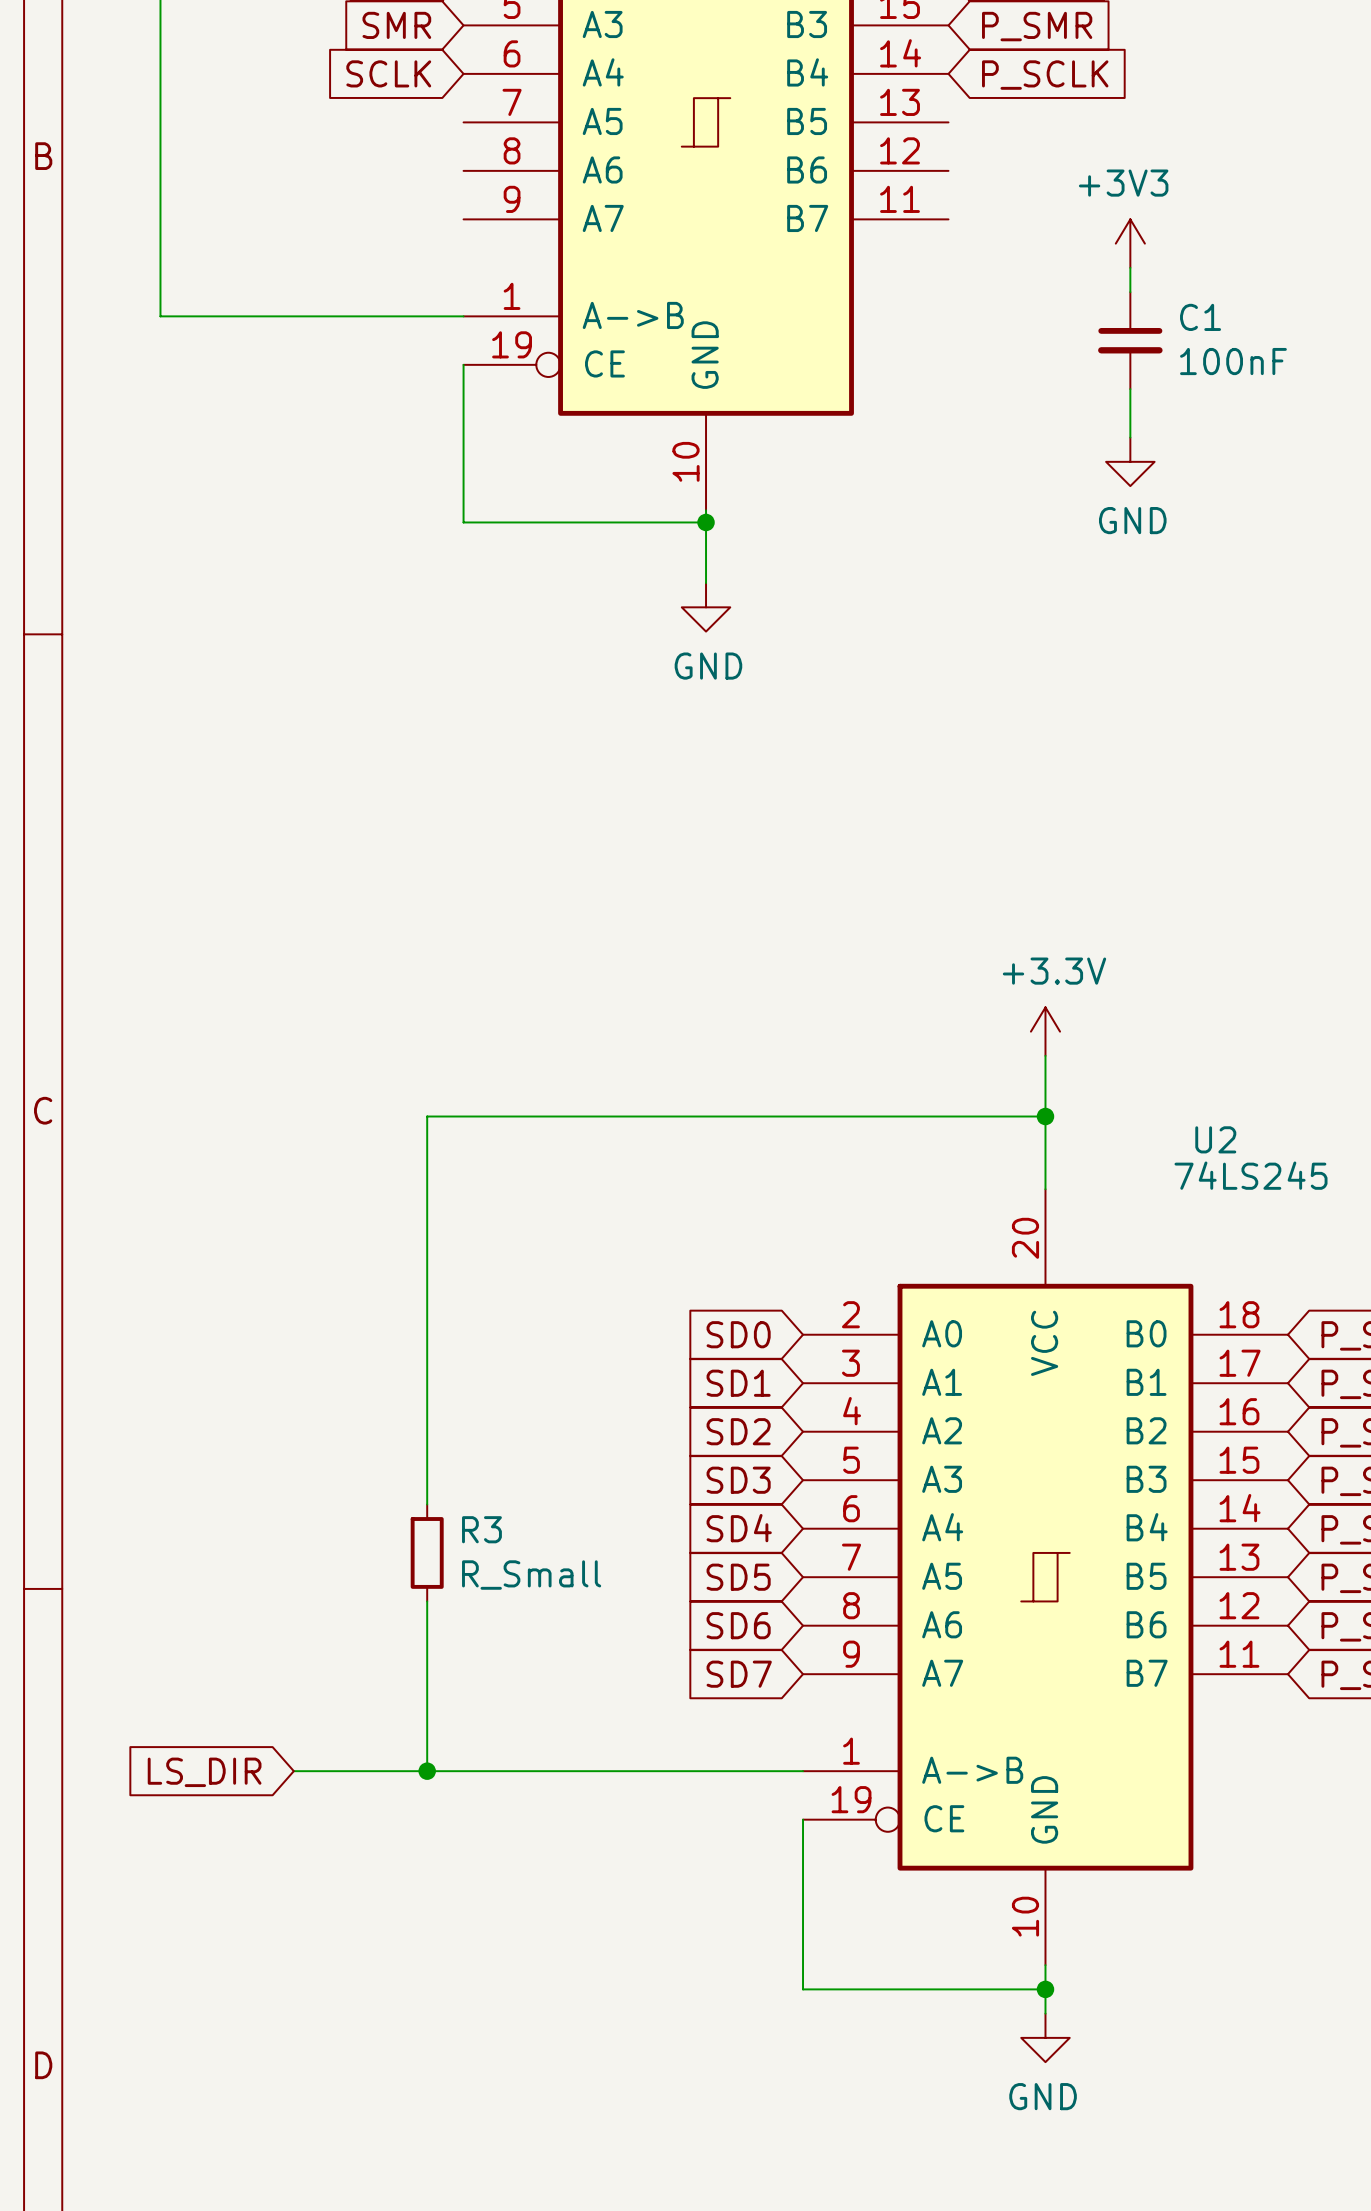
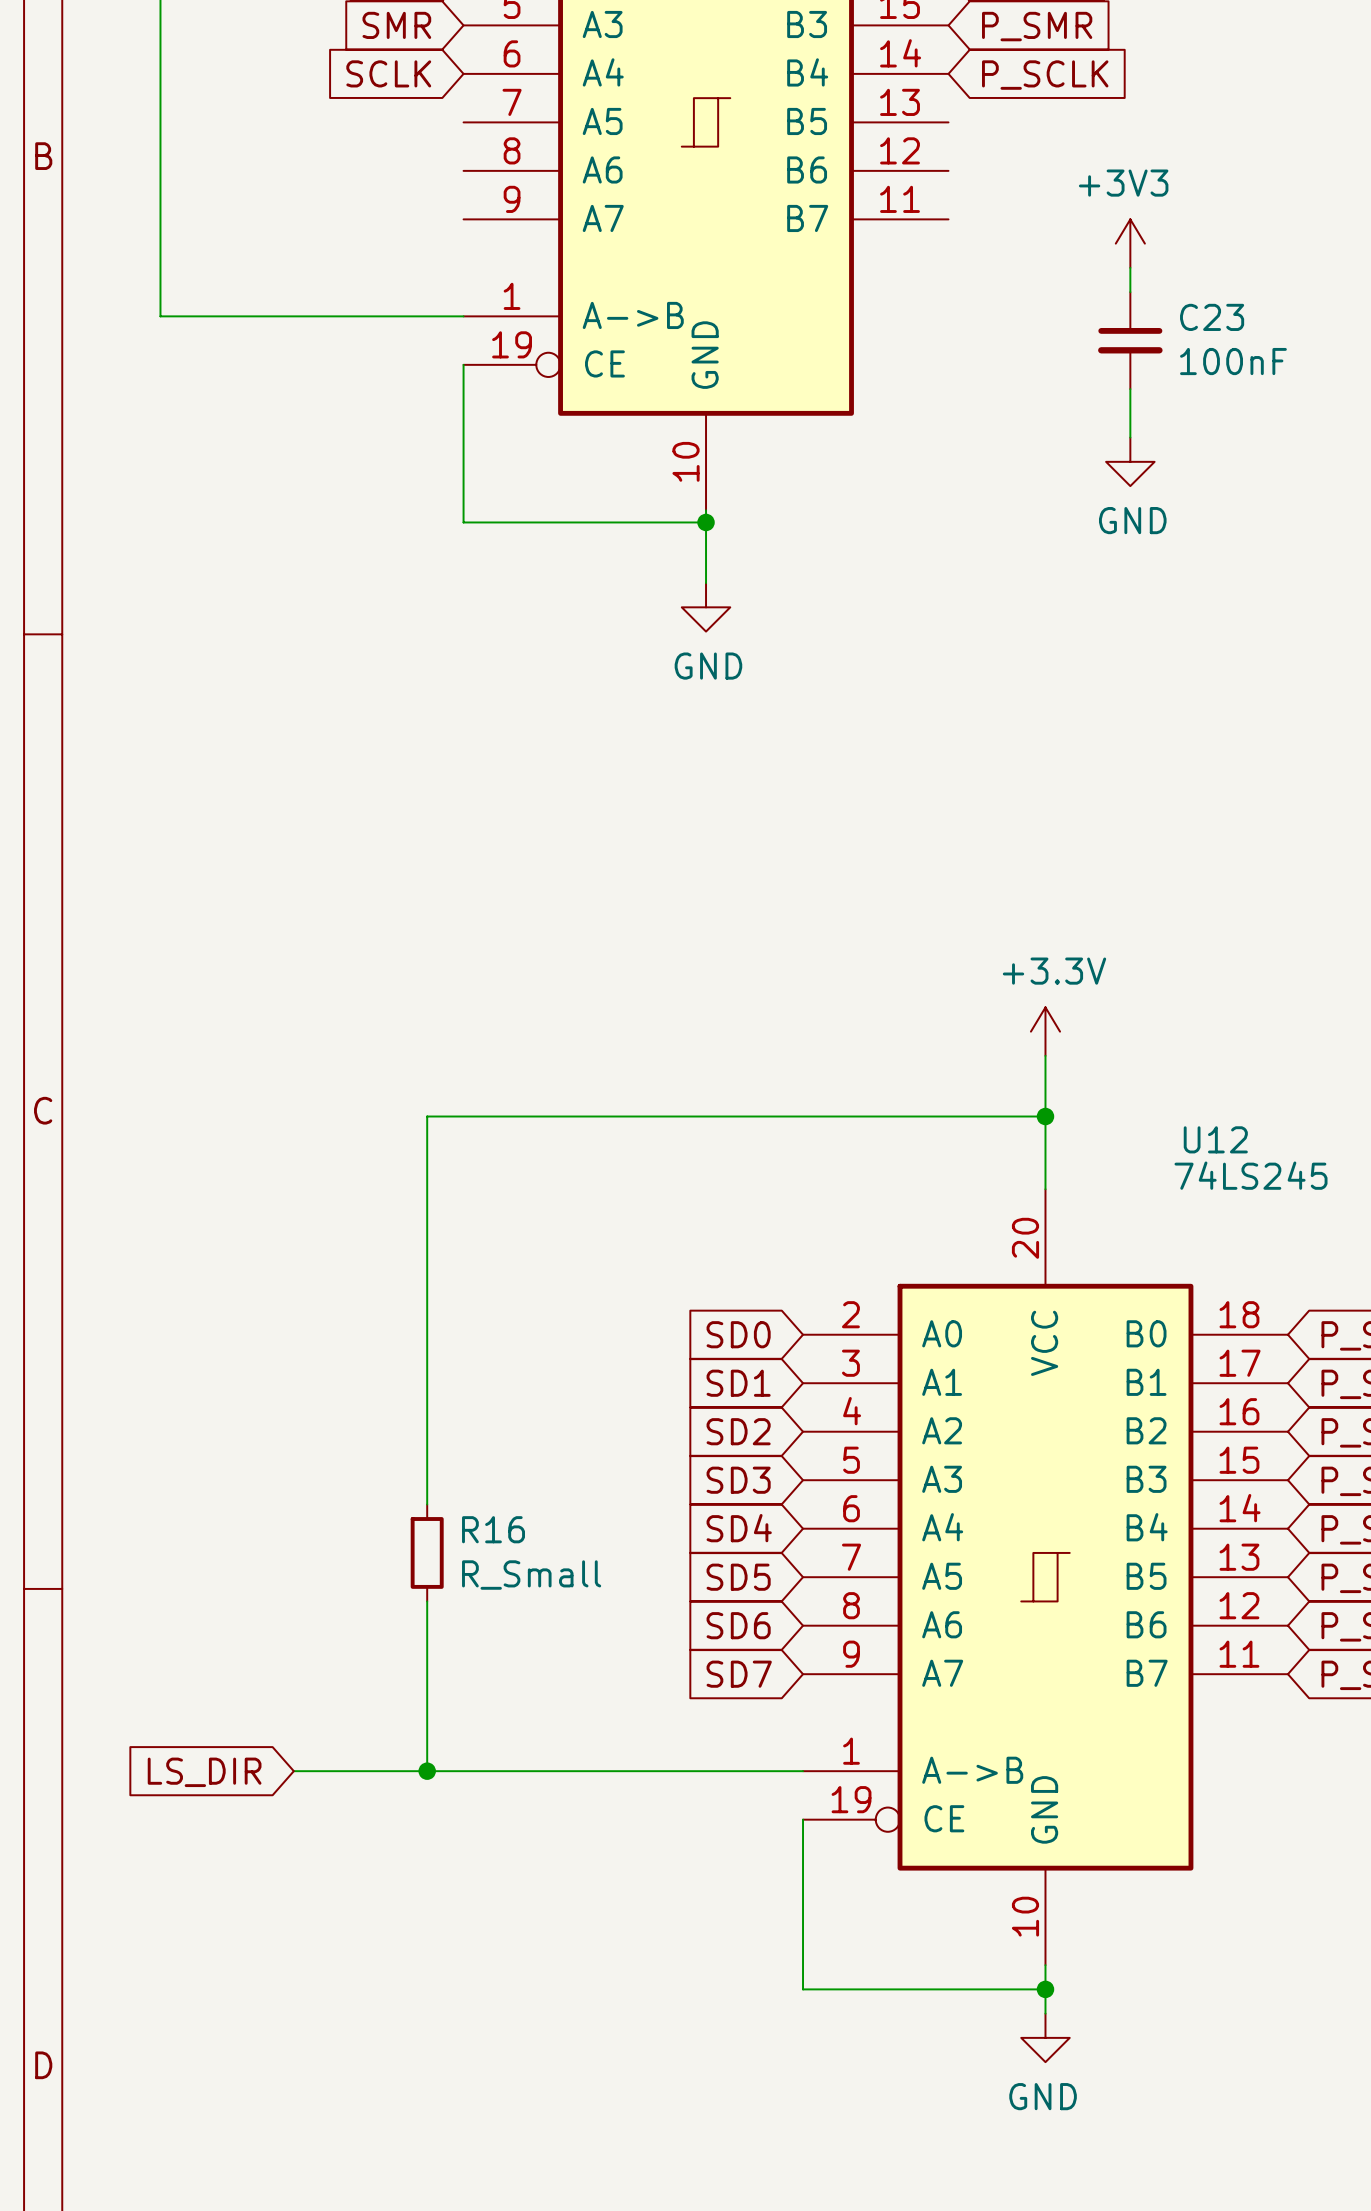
C1 name: C1 (1200, 317) -> C23 (1212, 317)
U2 name: U2 (1215, 1139) -> U12 (1215, 1139)
R3 name: R3 (481, 1529) -> R16 (493, 1529)

